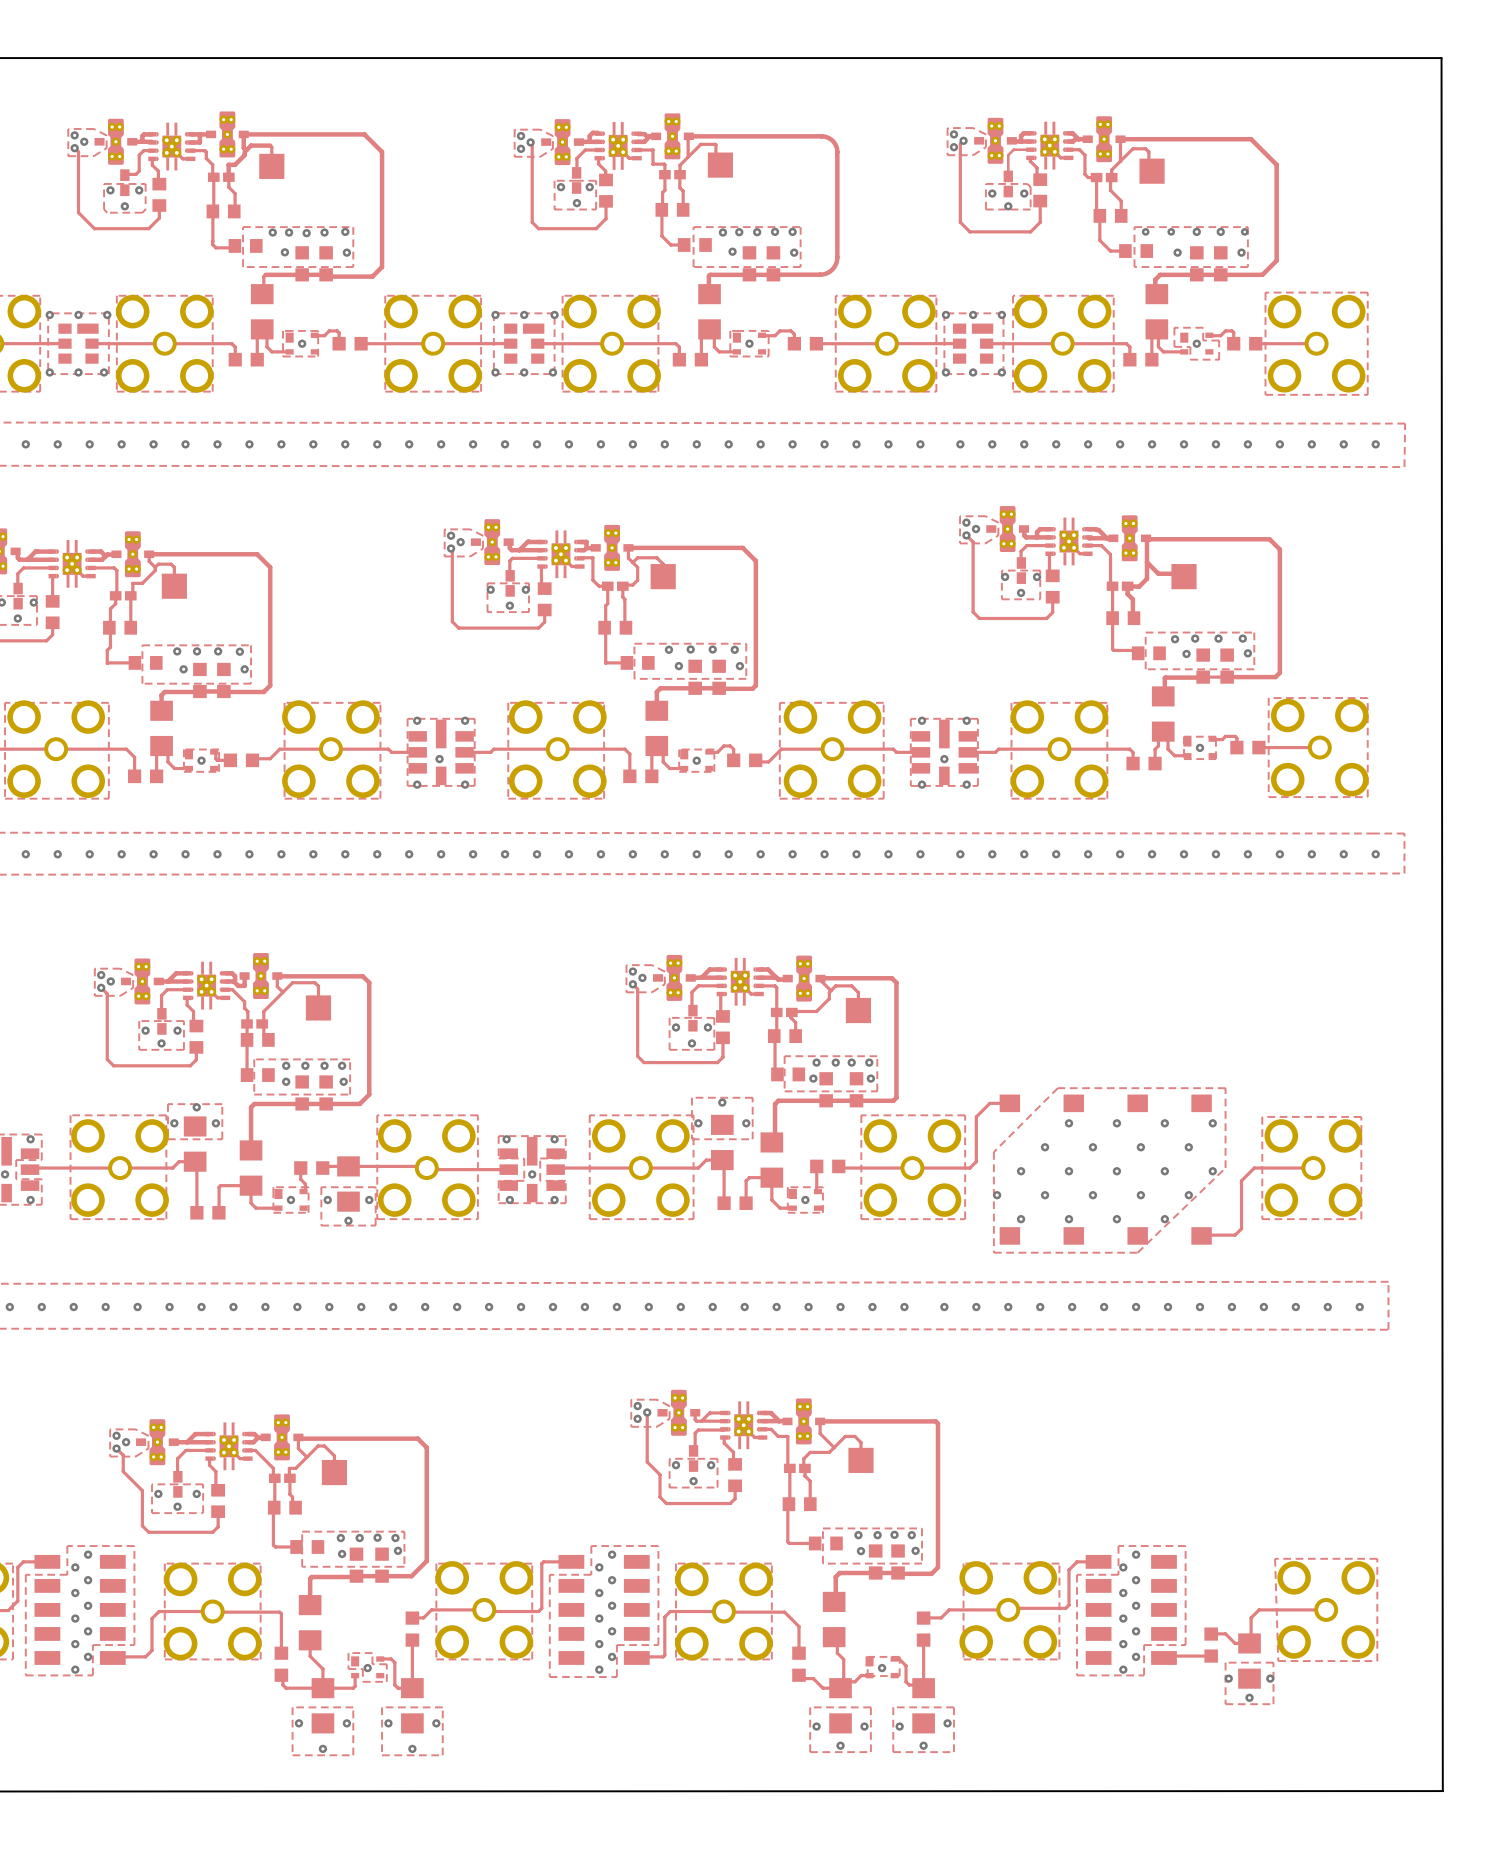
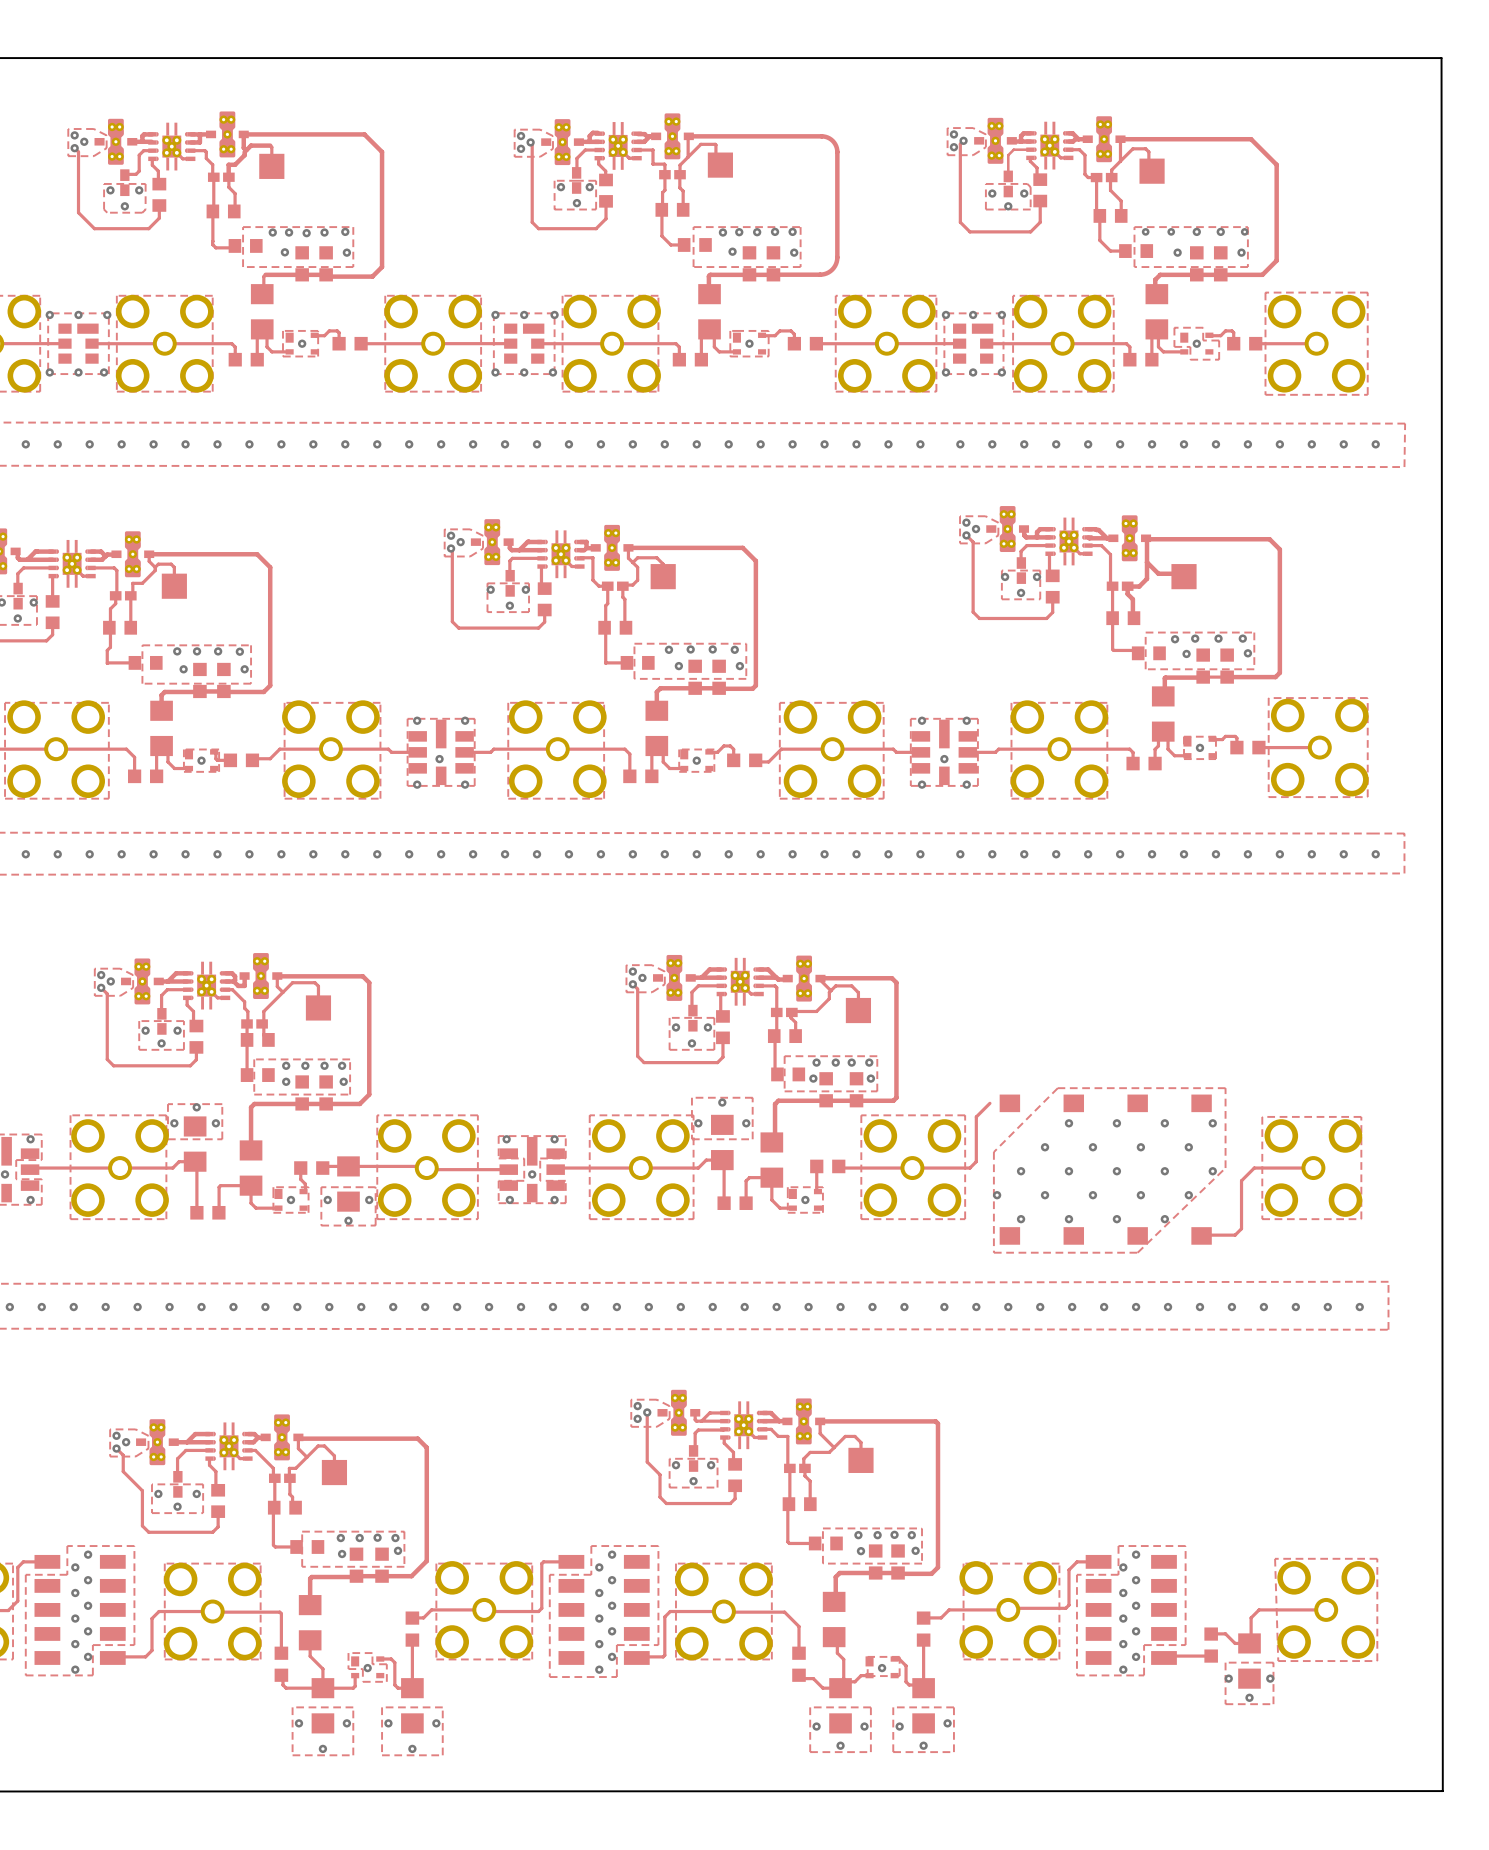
top track: (1009, 1103) (989, 1103) -> none

